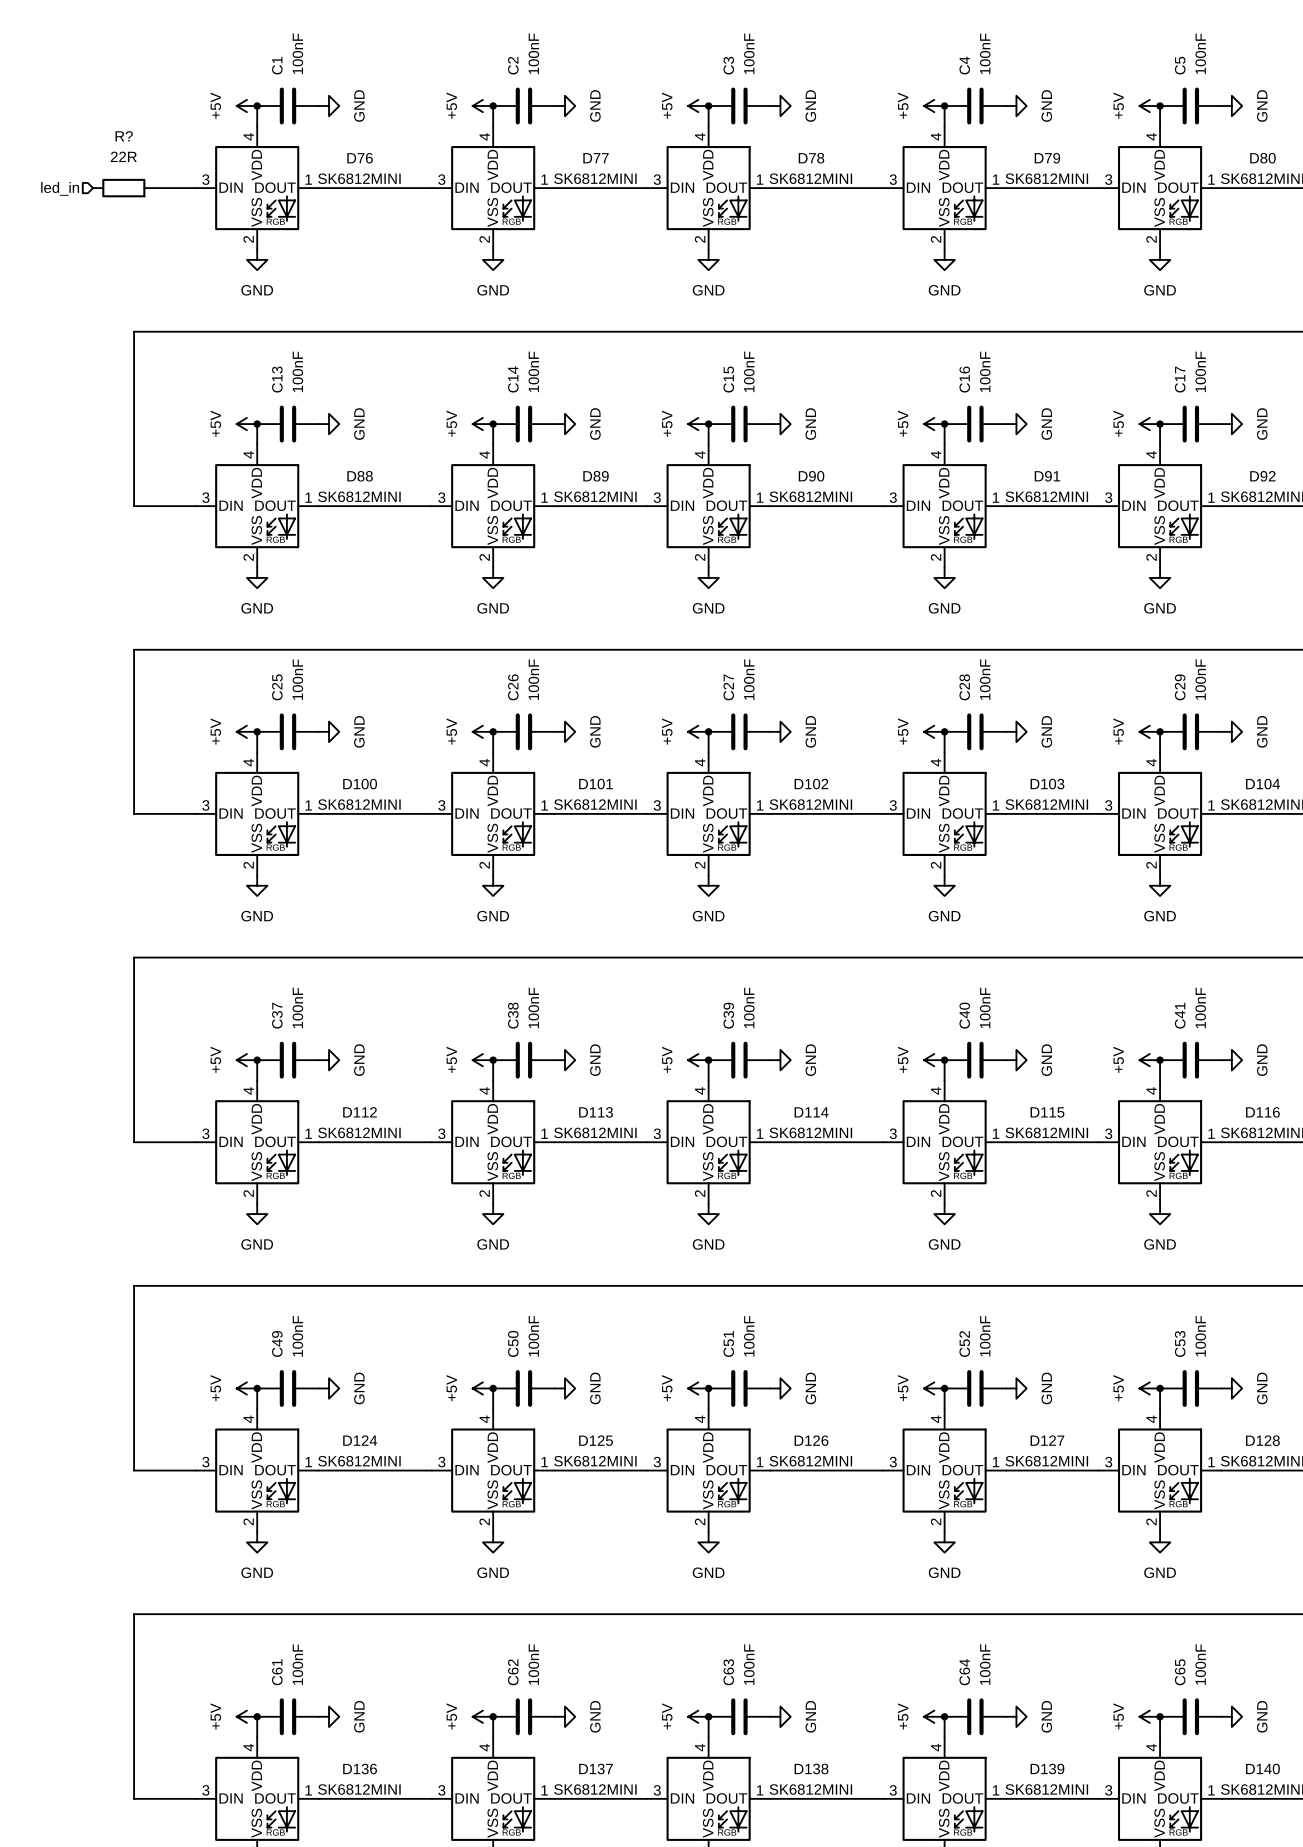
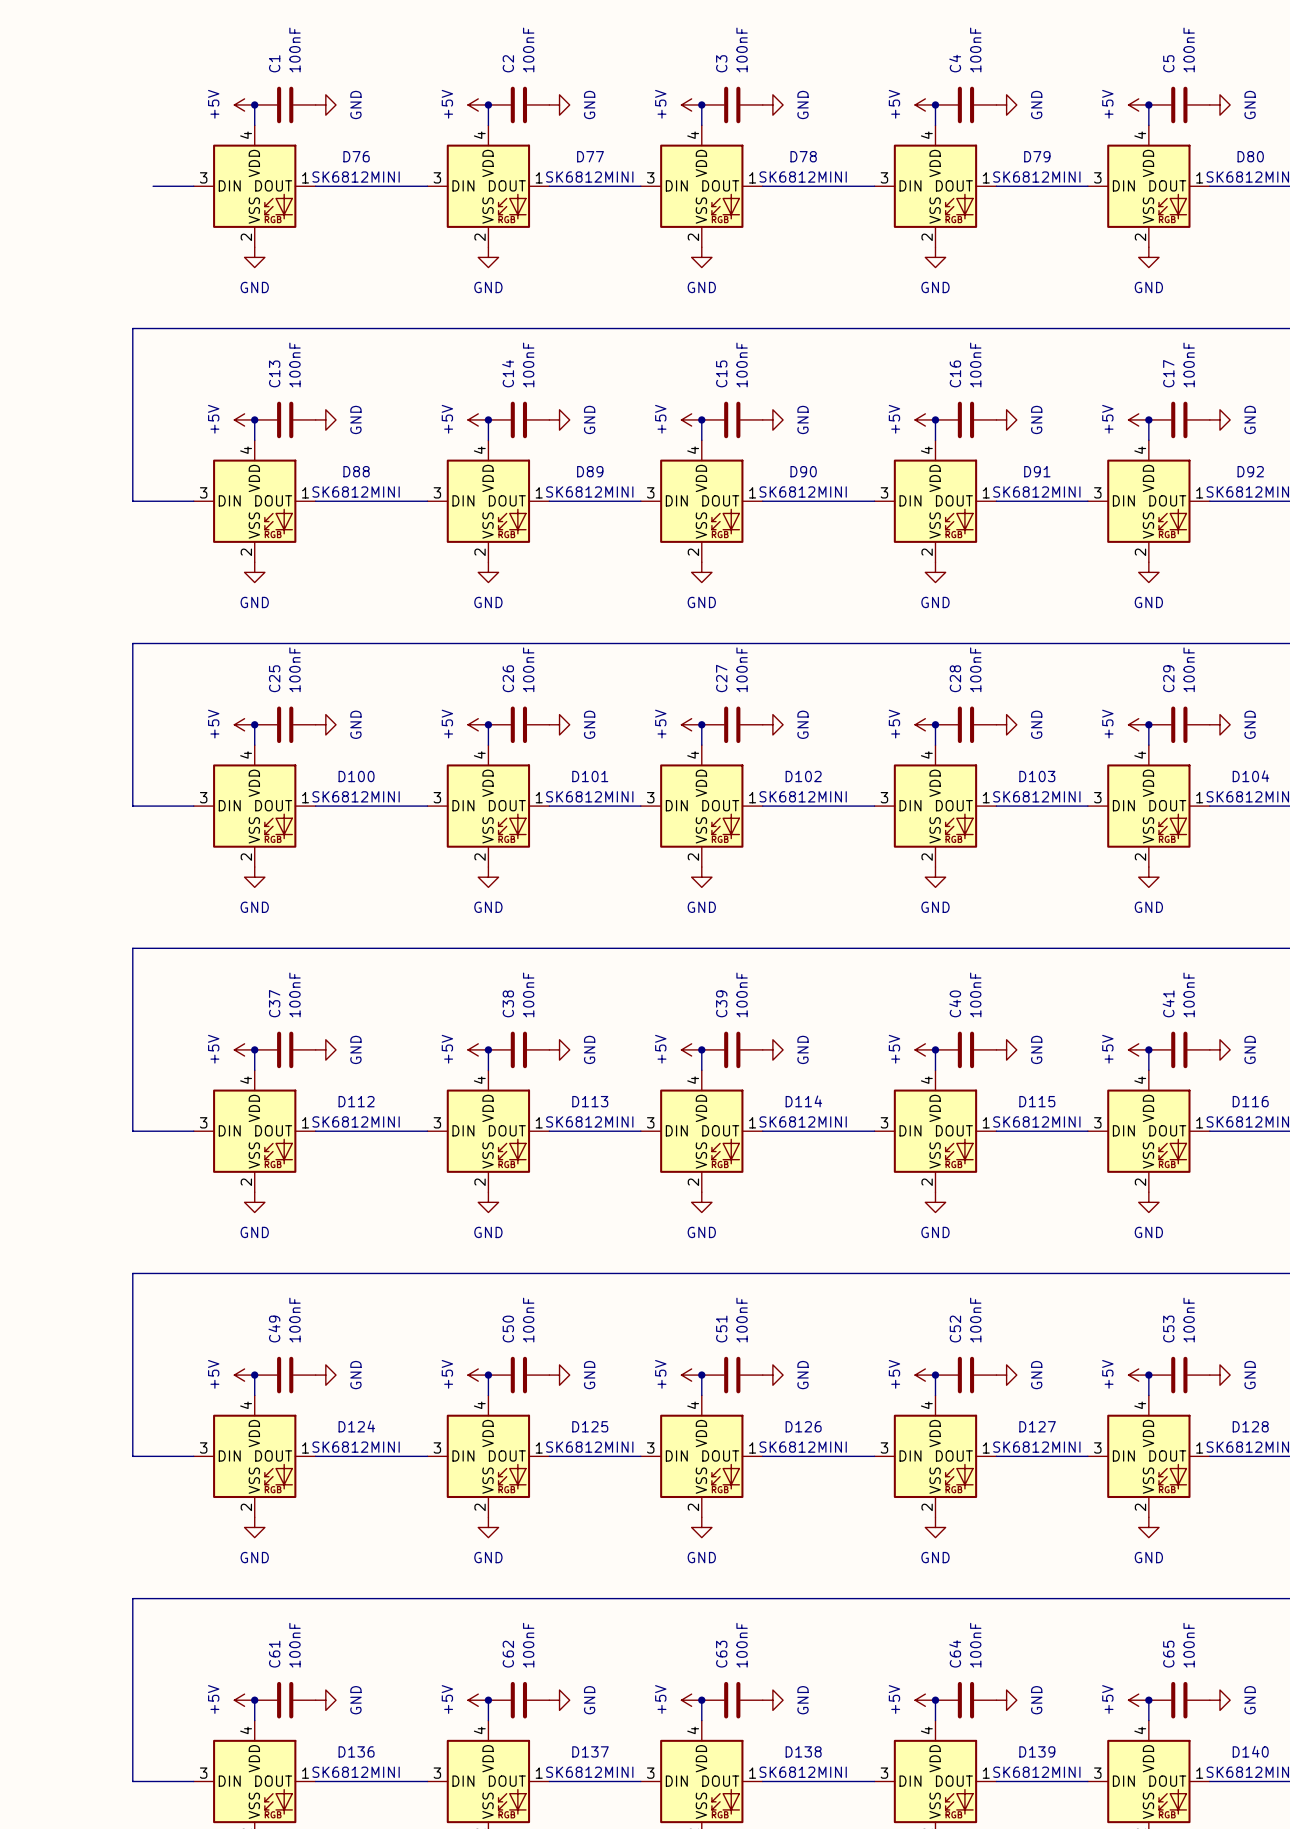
hierarchical label: led_in (60, 188) -> none
R?: 22R (123, 188) -> none

